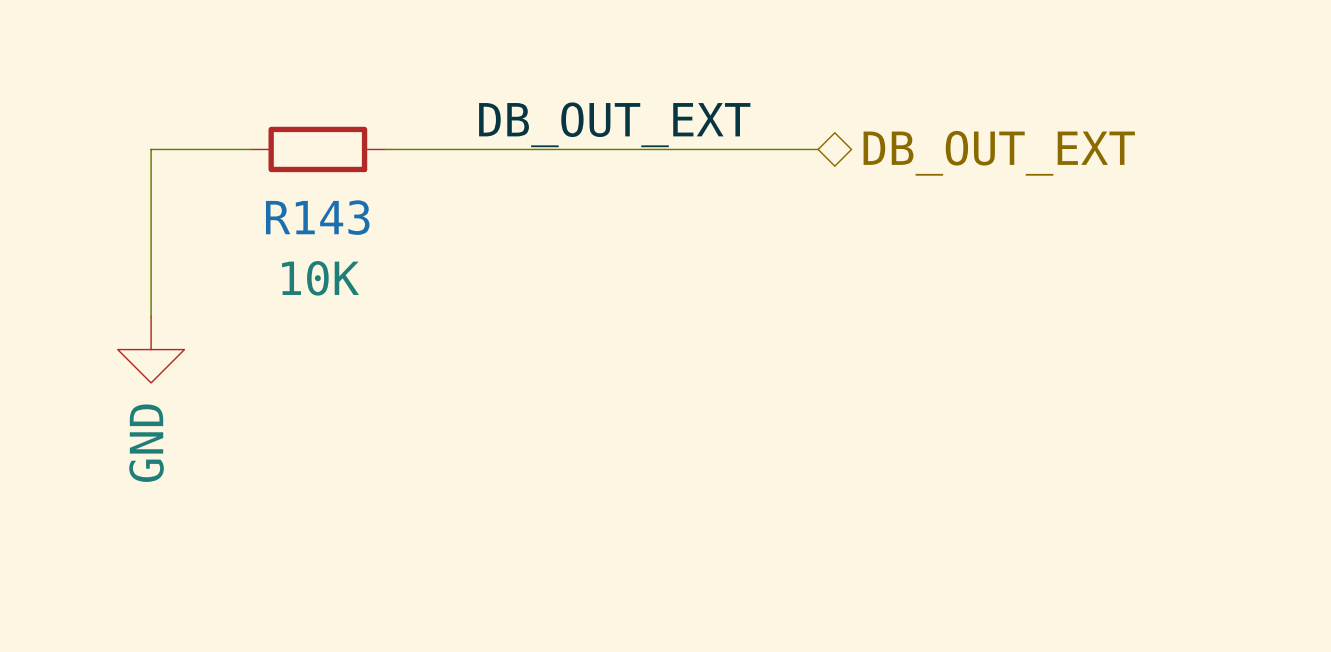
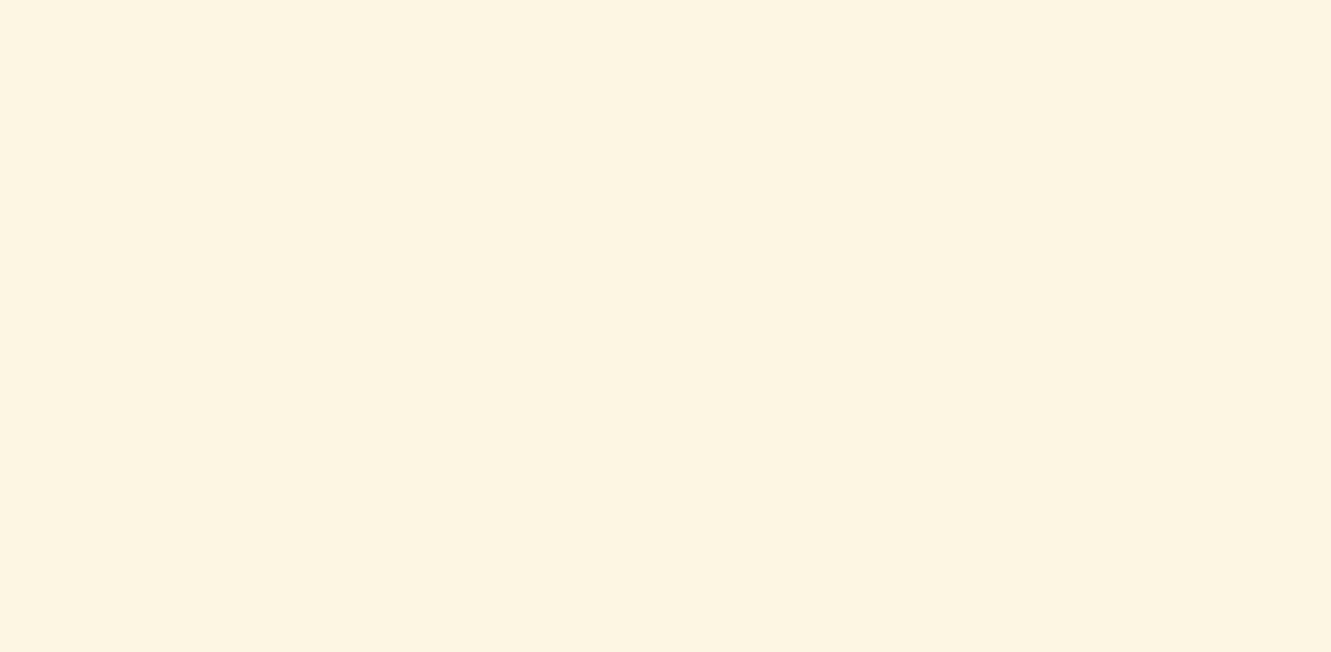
label: DB_OUT_EXT (614, 124) -> none
wire: (251, 149) (151, 149) (151, 316) -> none
R143: 10K (317, 149) -> none
wire: (384, 149) (818, 149) -> none
hierarchical label: DB_OUT_EXT (999, 153) -> none
power symbol: GND (151, 349) -> none

